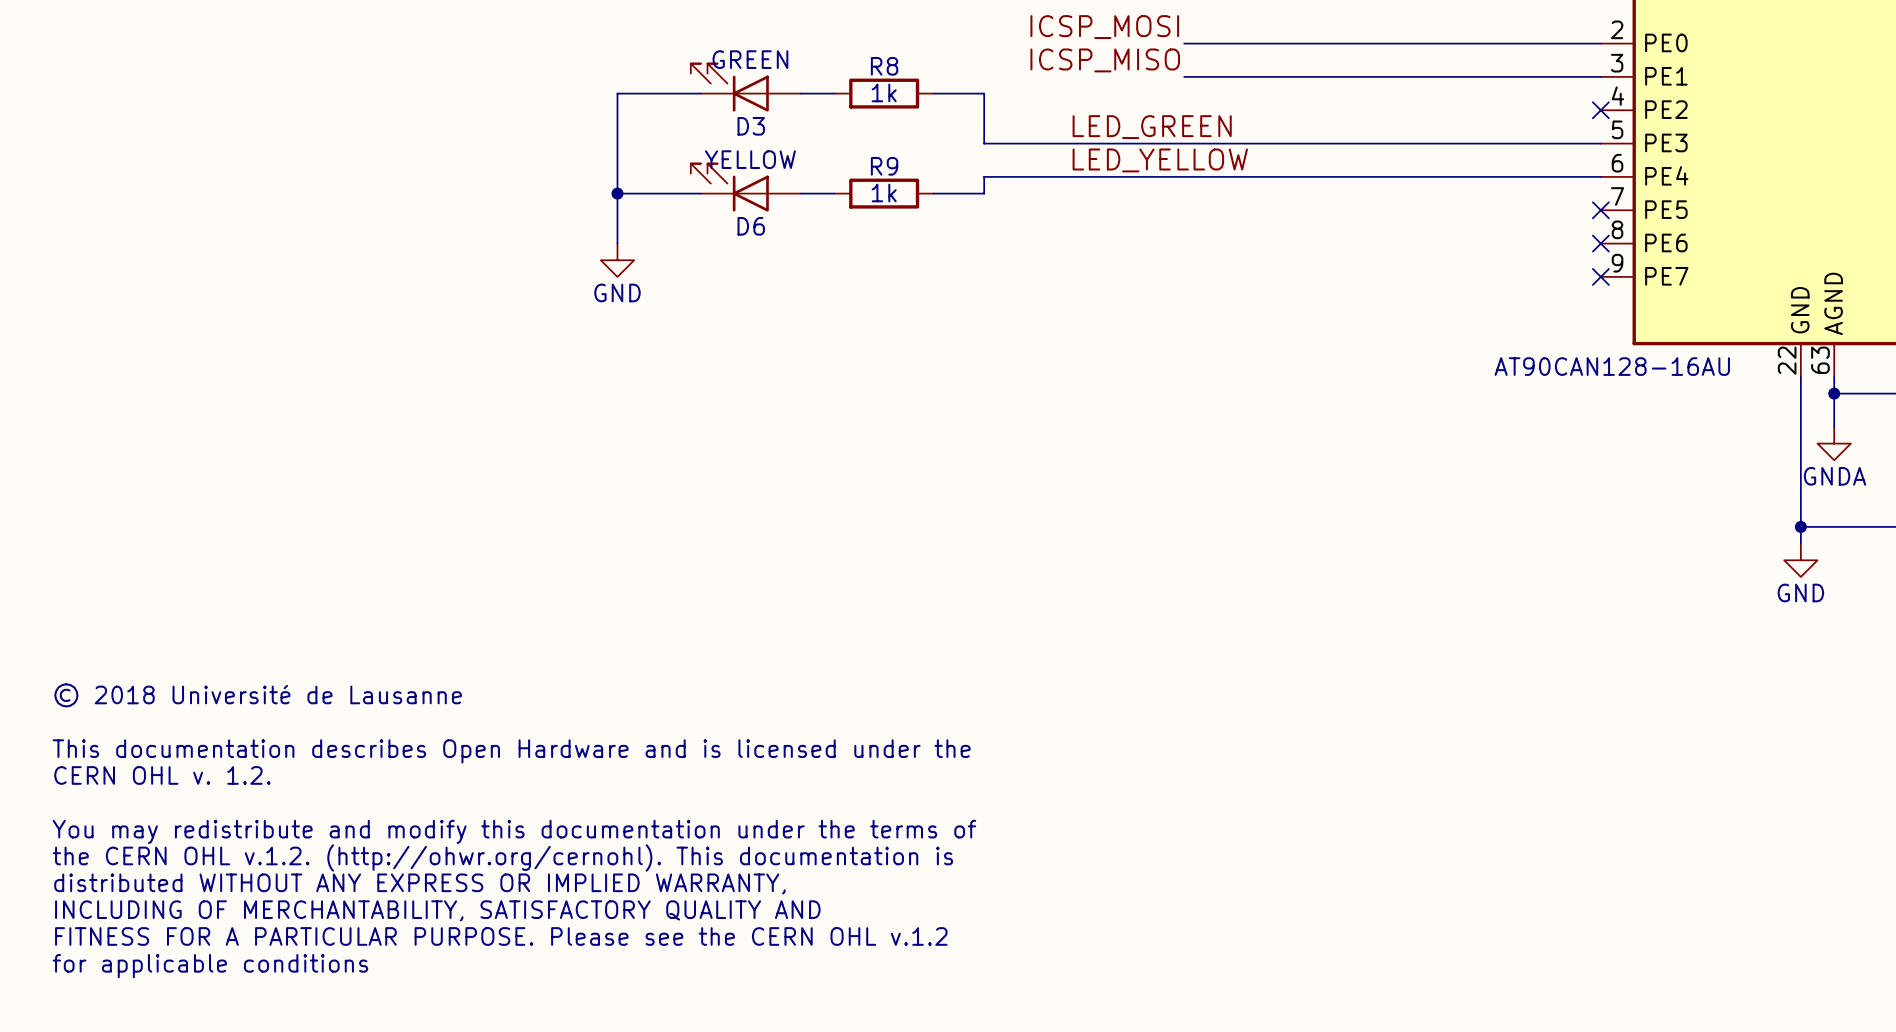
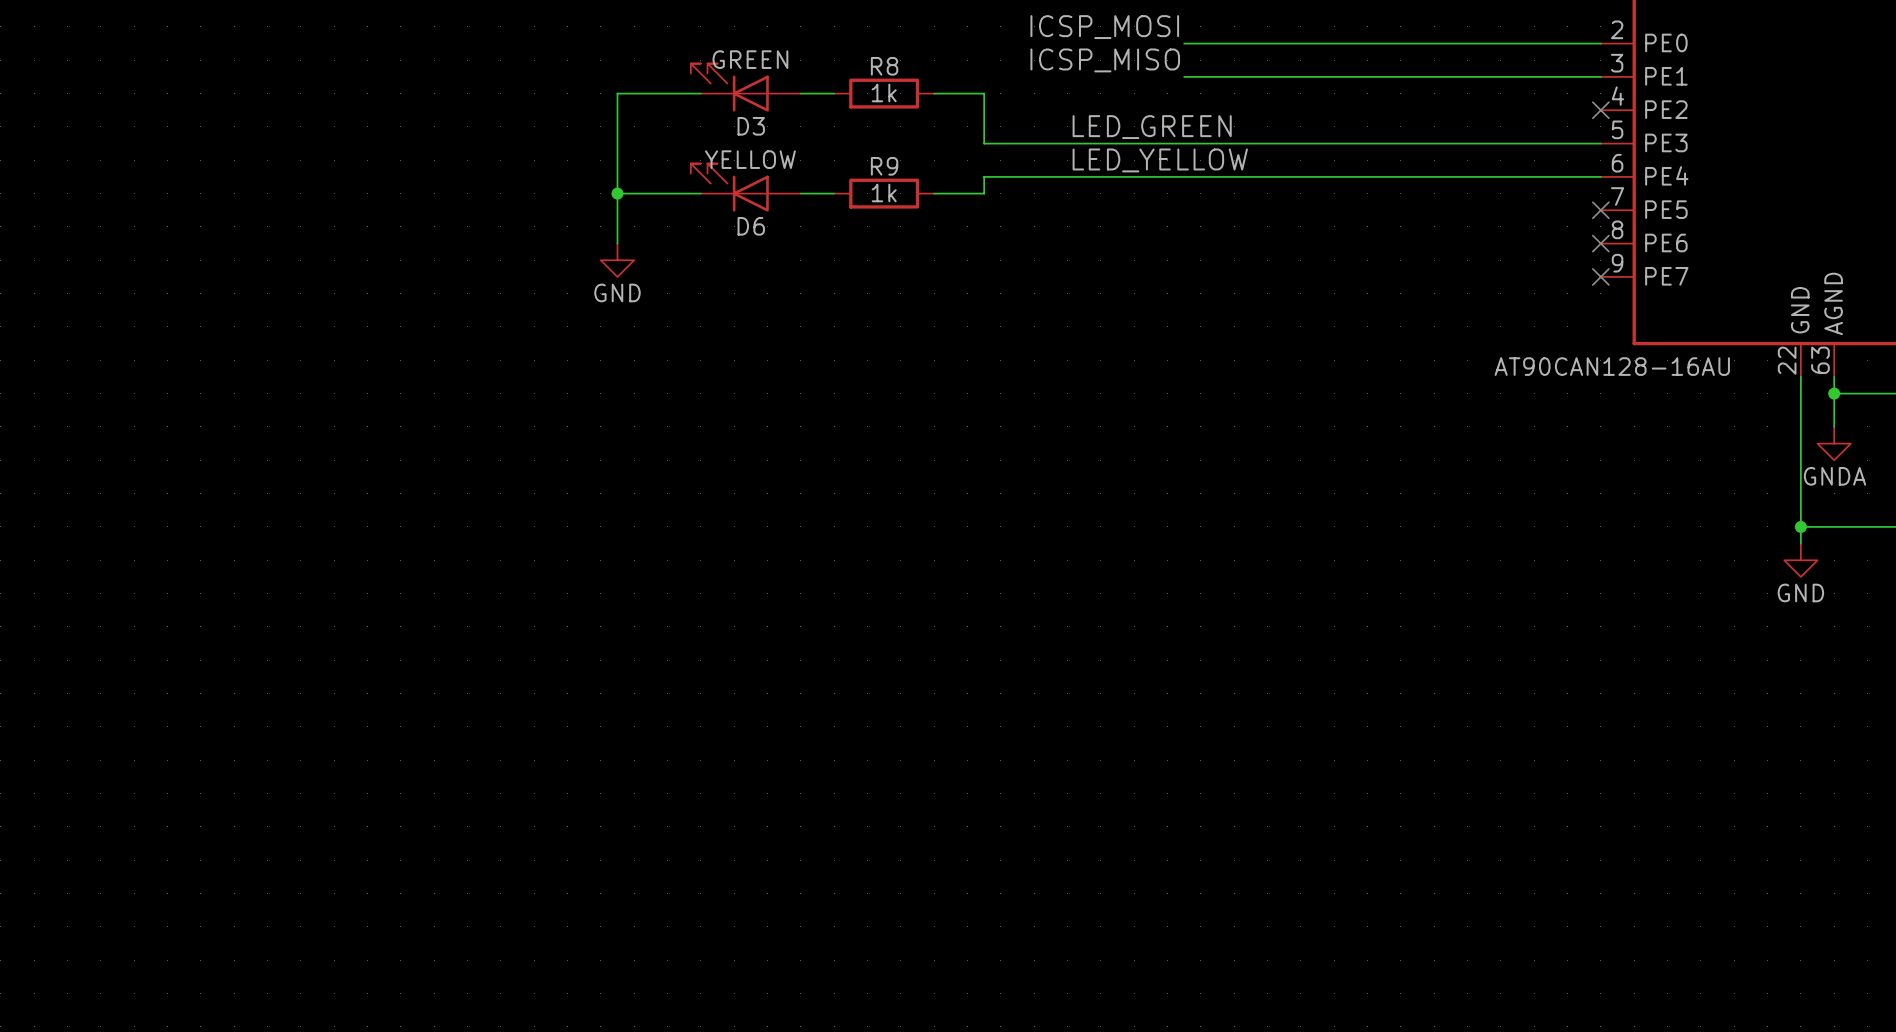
text: © 2018 Université de Lausanne (258, 695) -> none
text: This documentation describes Open Hardware and is licensed under the (511, 751) -> none
text: CERN OHL v. 1.2. (162, 775) -> none
text: You may redistribute and modify this documentation under the terms of (514, 831) -> none
text: the CERN OHL v.1.2. (http://ohwr.org/cernohl). This documentation is (502, 857) -> none
text: distributed WITHOUT ANY EXPRESS OR IMPLIED WARRANTY, (419, 884) -> none
text: INCLUDING OF MERCHANTABILITY, SATISFACTORY QUALITY AND (437, 910) -> none
text: FITNESS FOR A PARTICULAR PURPOSE. Please see the CERN OHL v.1.2 (501, 936) -> none
text: for applicable conditions (210, 966) -> none

